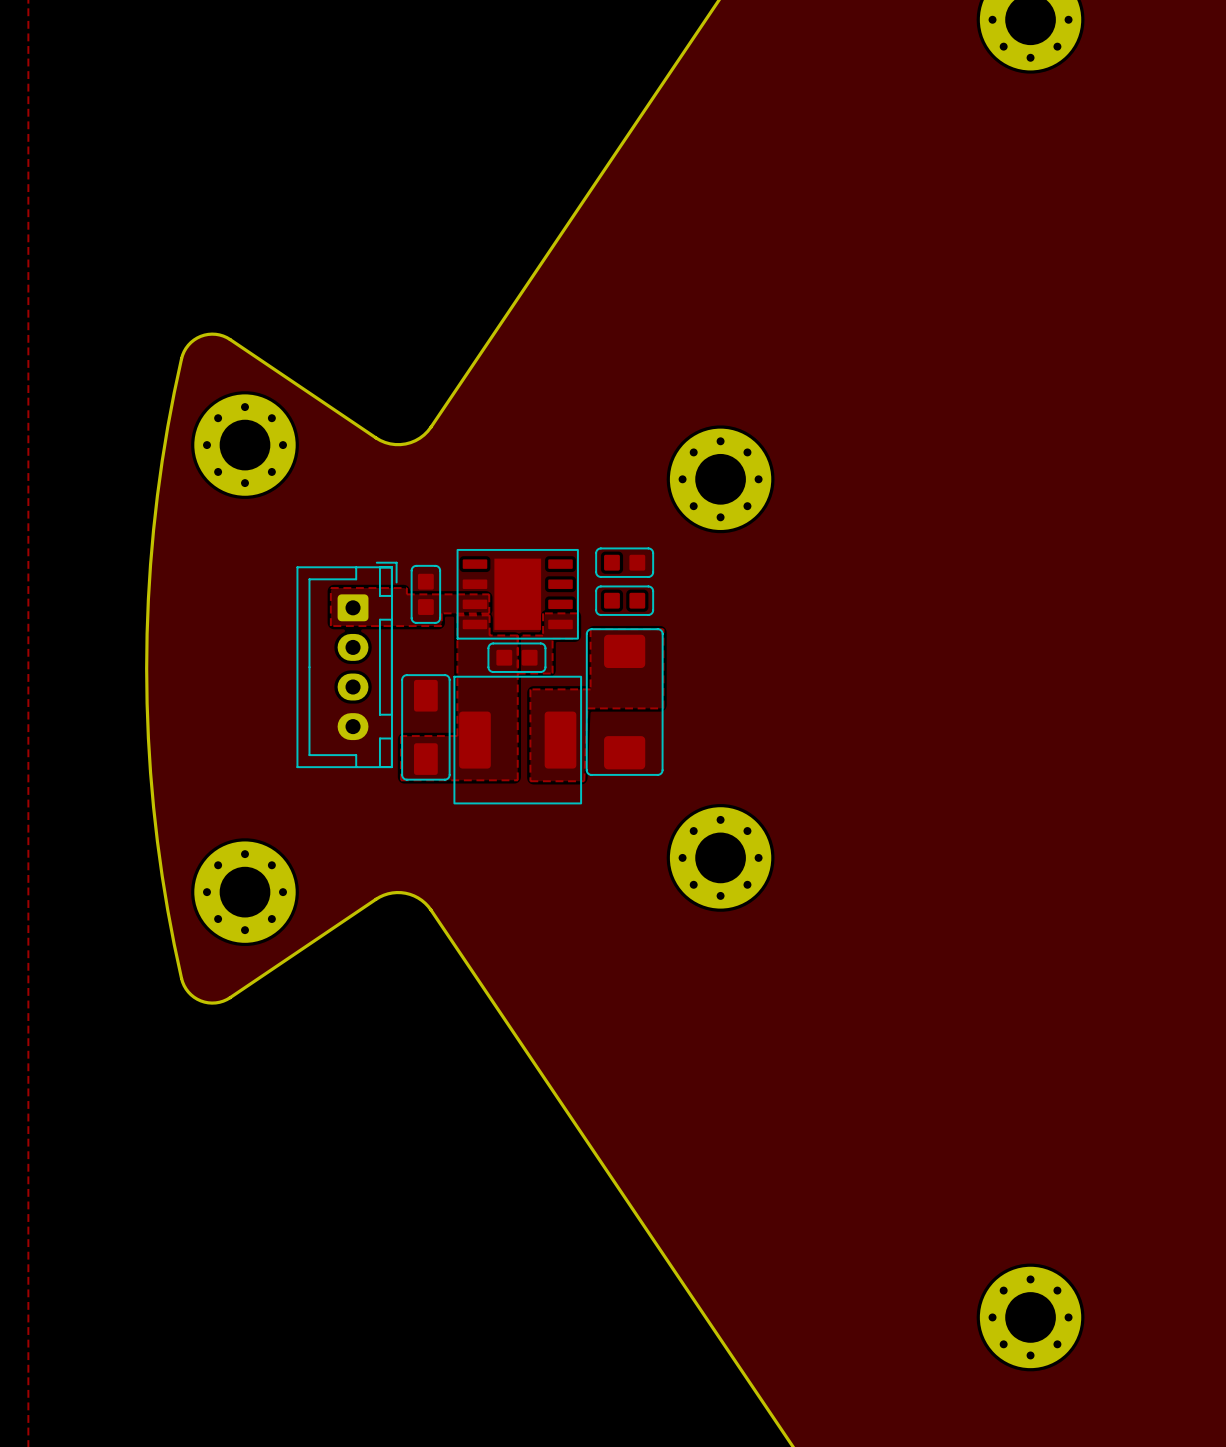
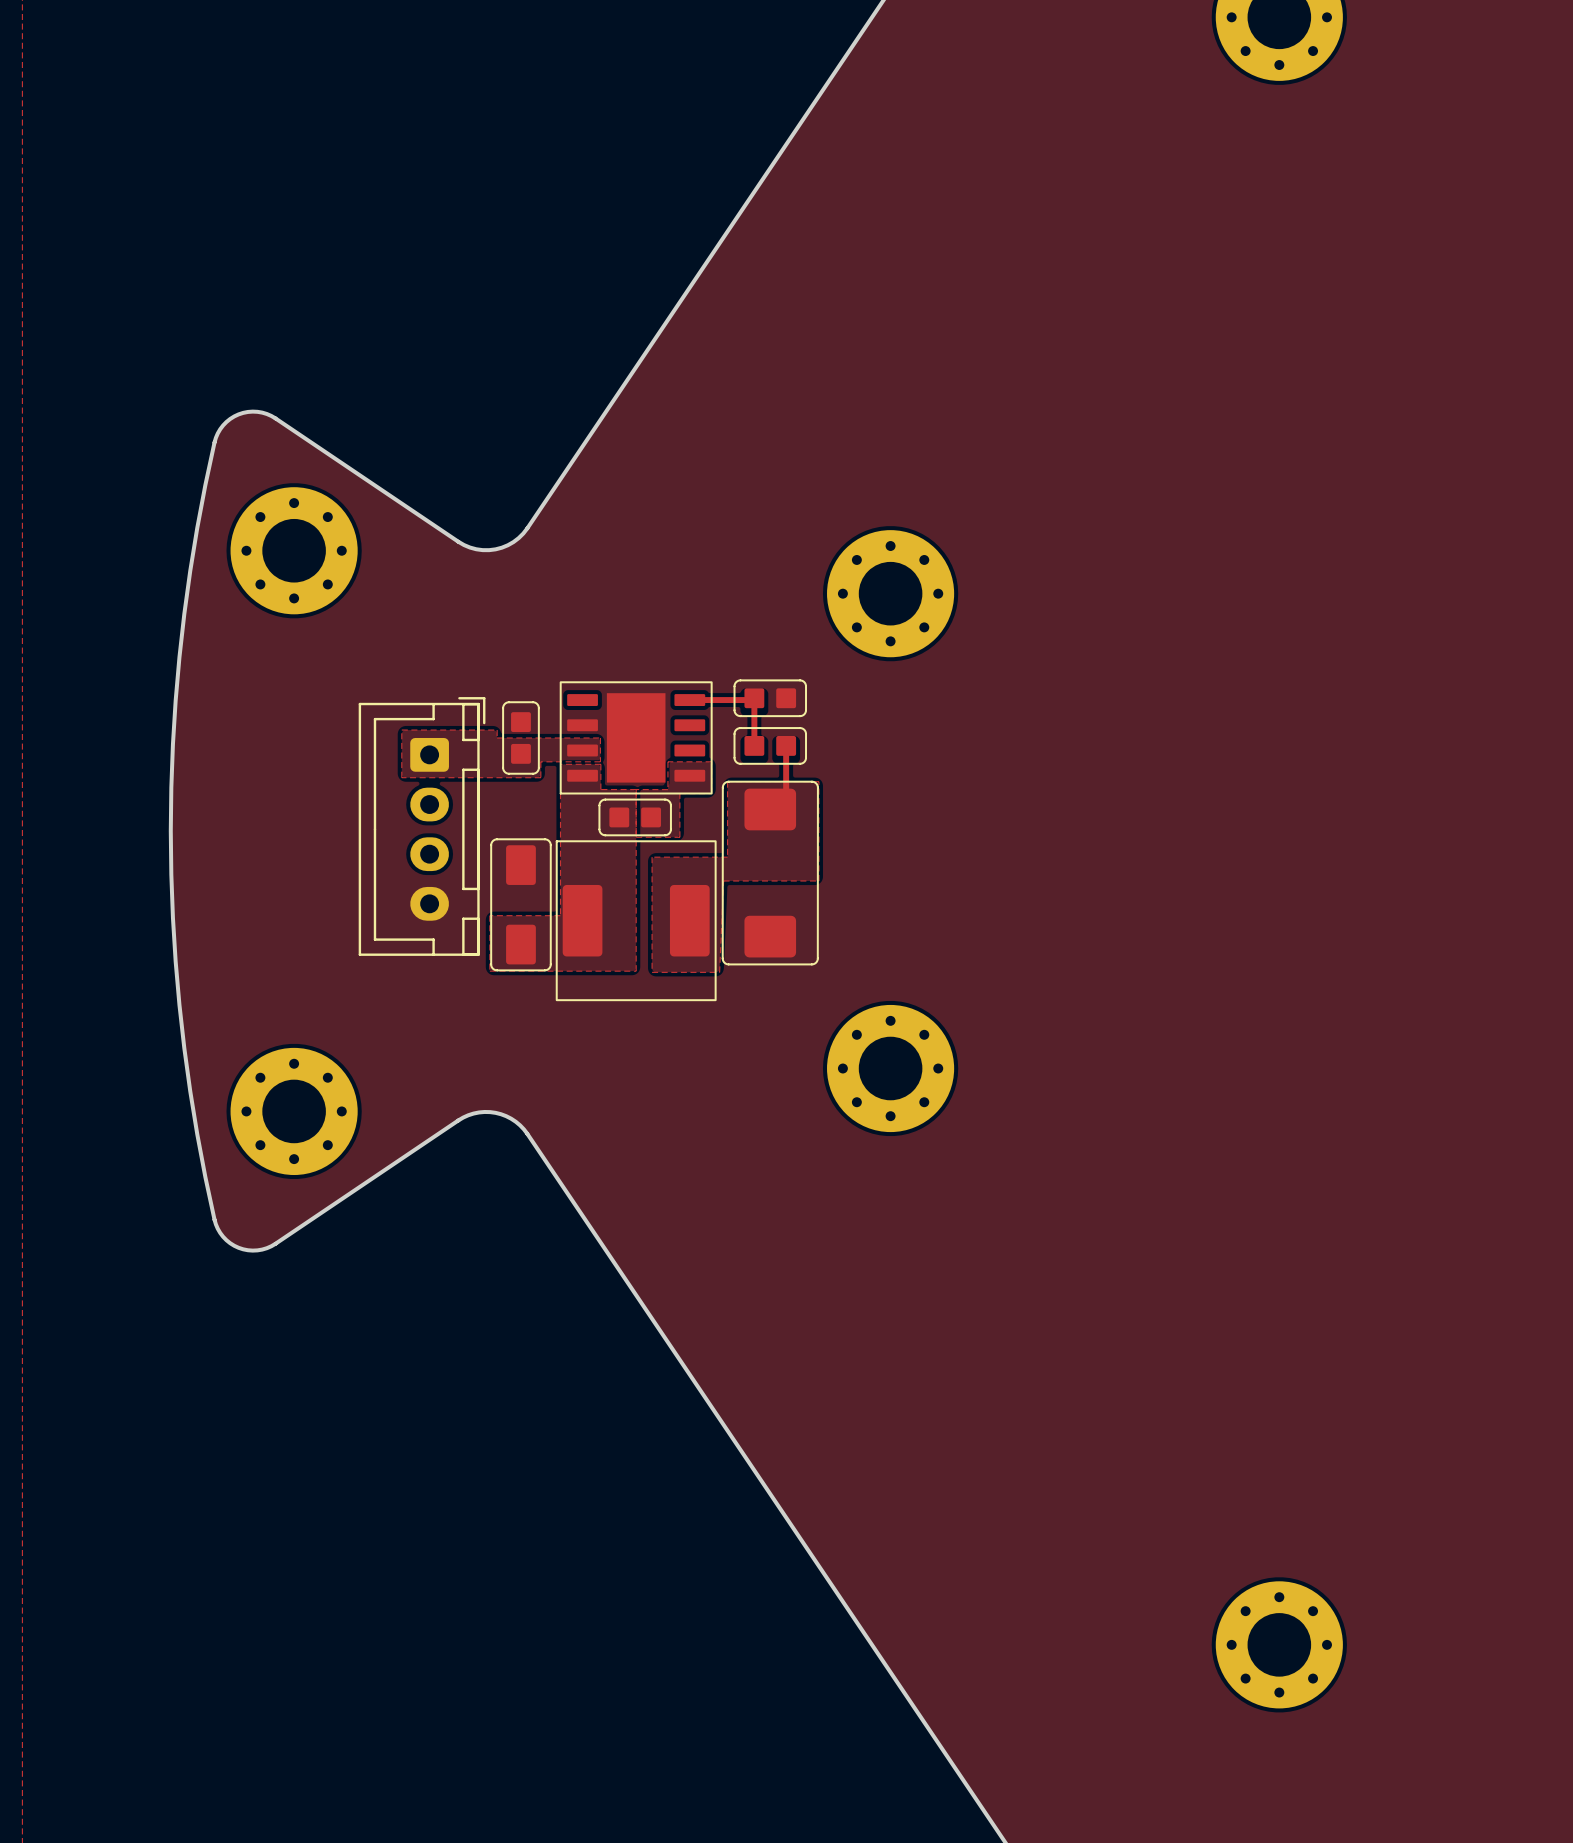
track: none -> (689, 700) (752, 700) (754, 702) (754, 749)
track: none -> (786, 749) (786, 793) (770, 809)

